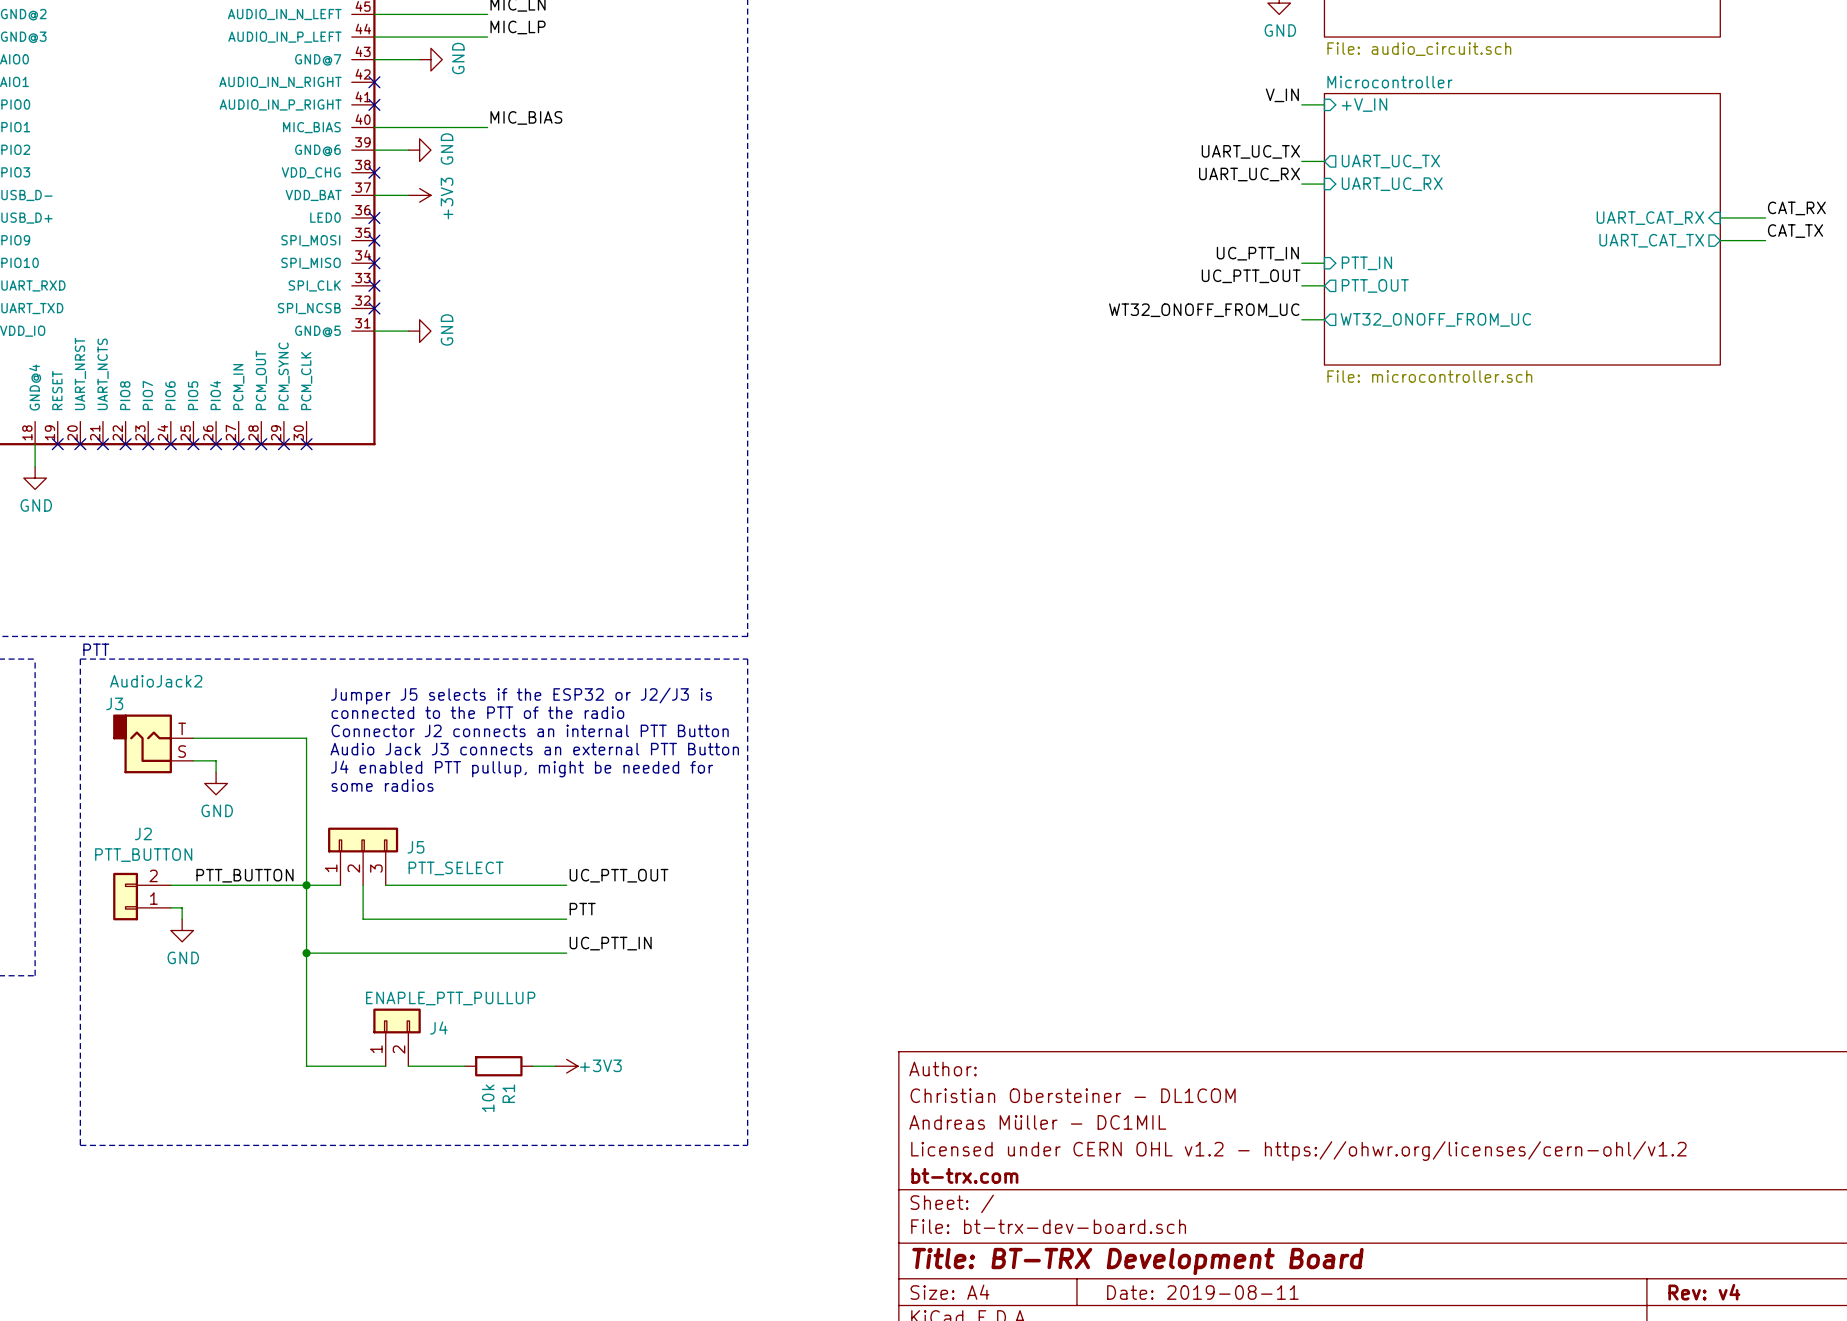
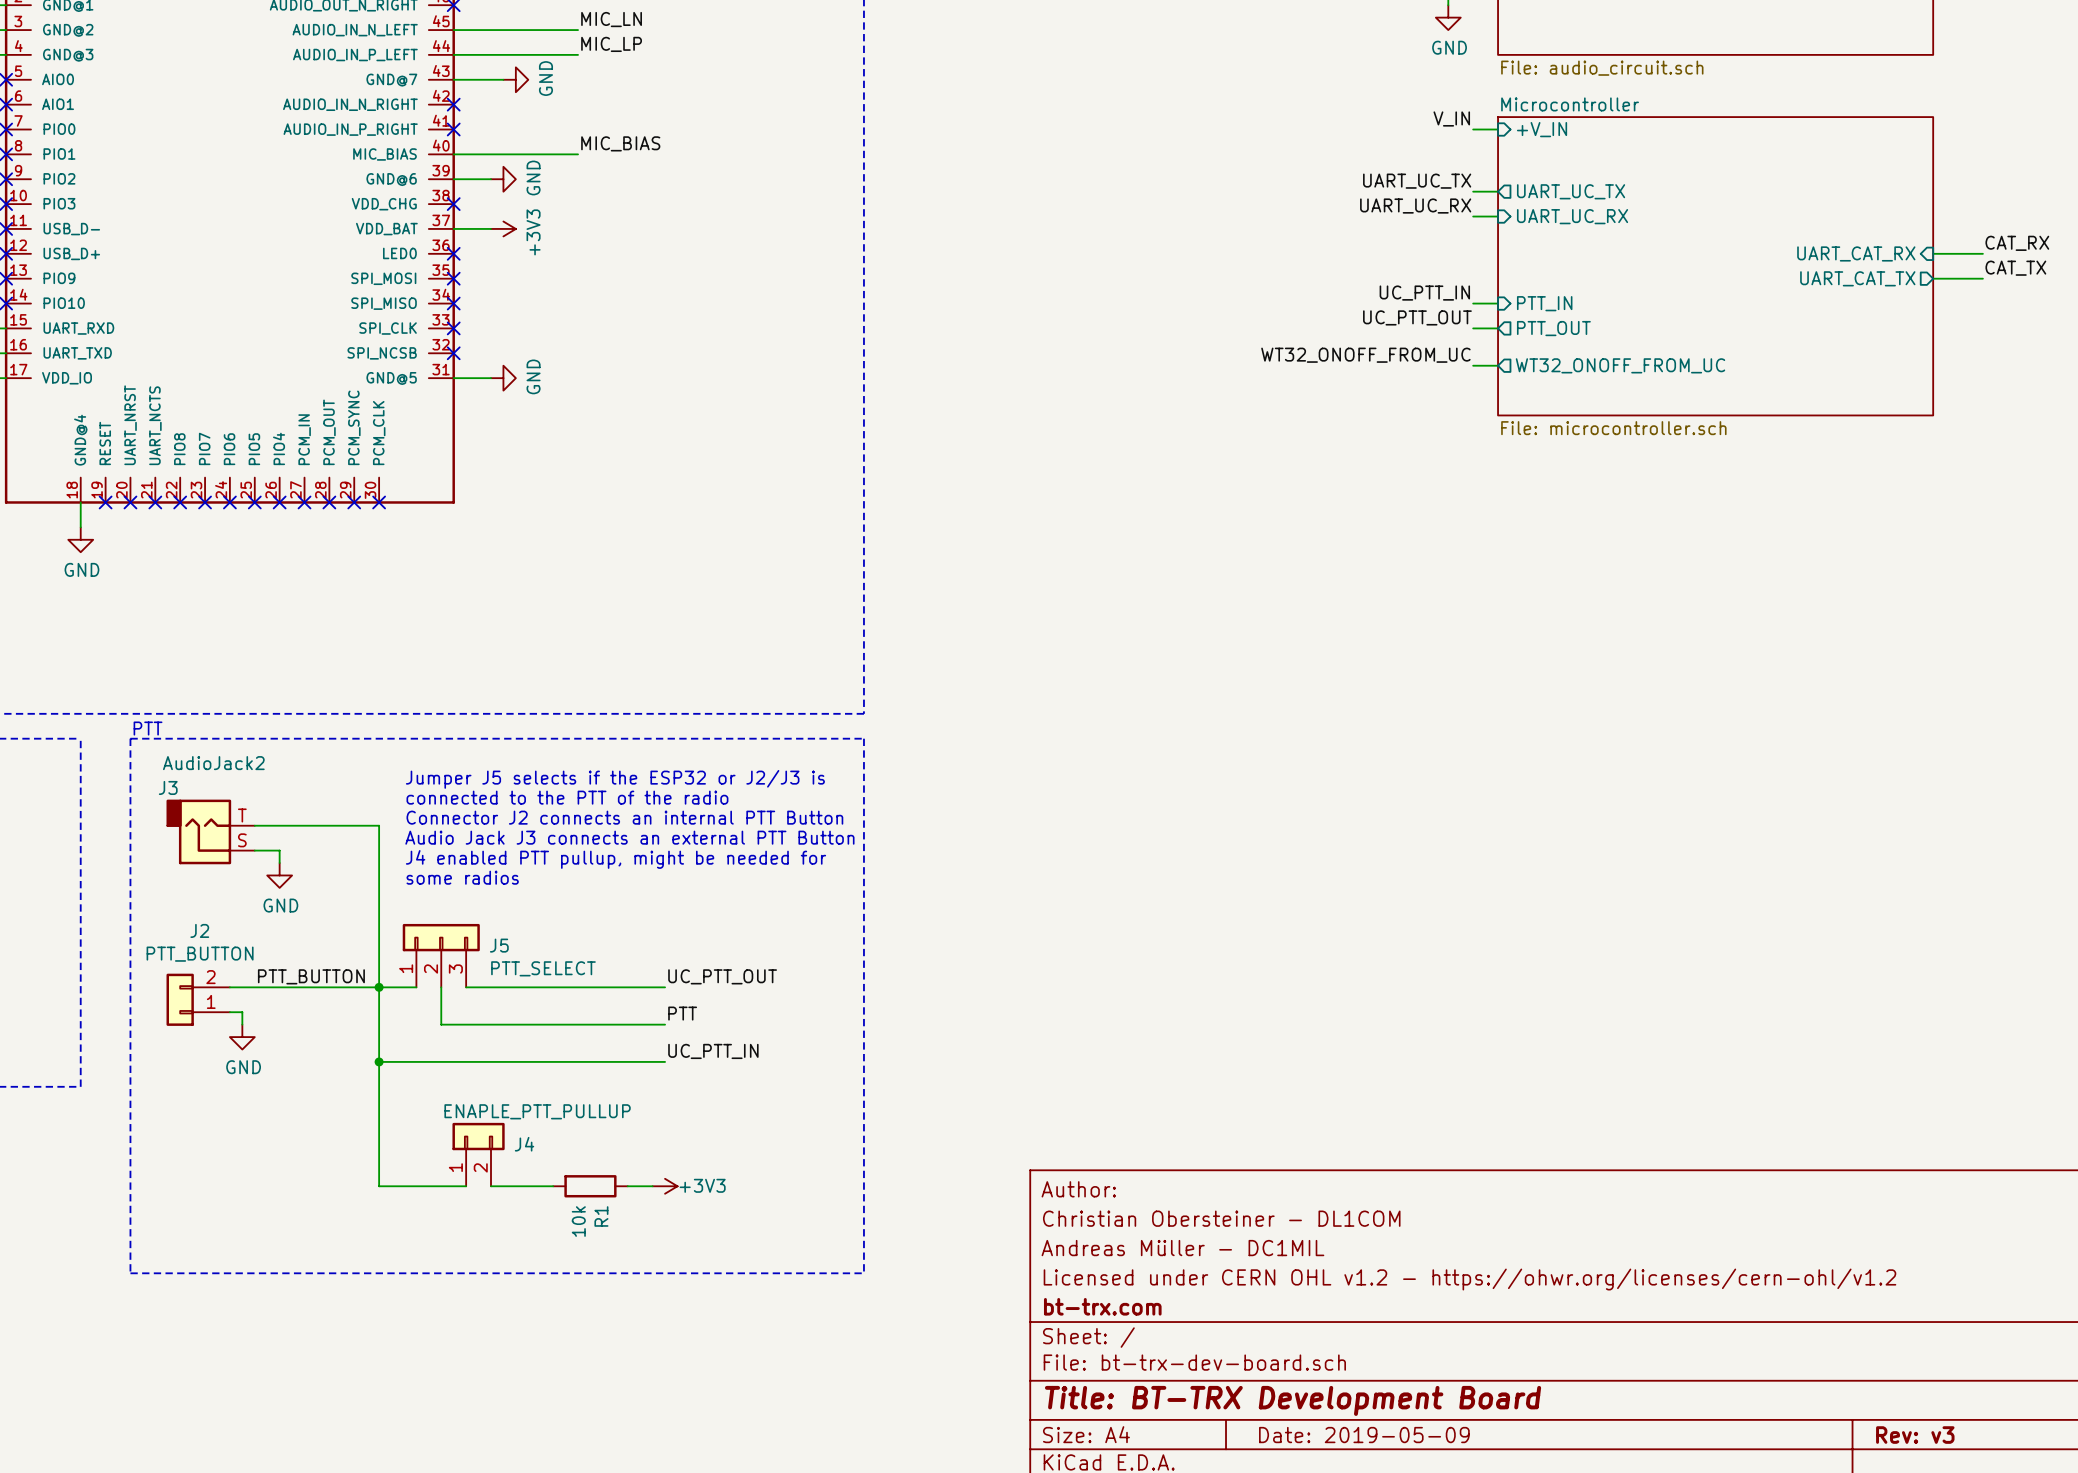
title block: Date: 2019-08-11 (1202, 1292) -> Date: 2019-05-09 (1364, 1435)
title block: Rev: v4 (1704, 1292) -> Rev: v3 (1915, 1435)

